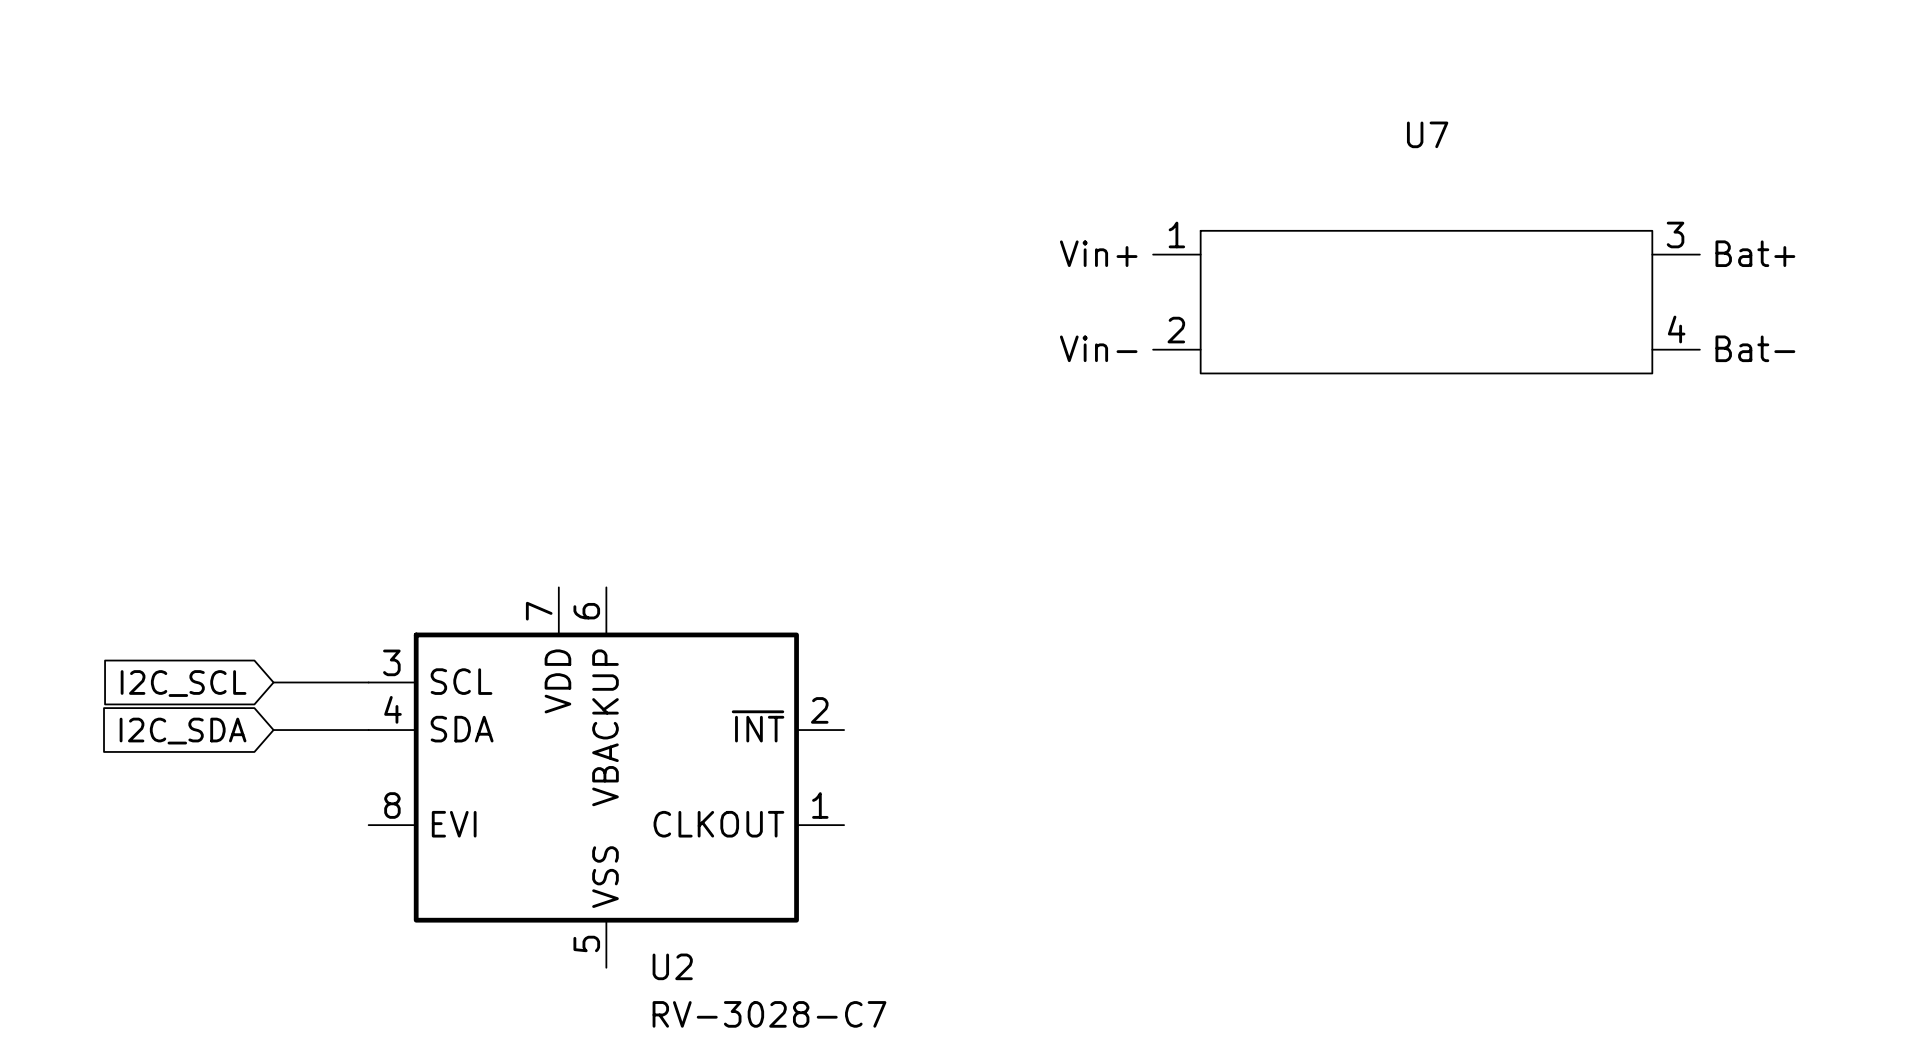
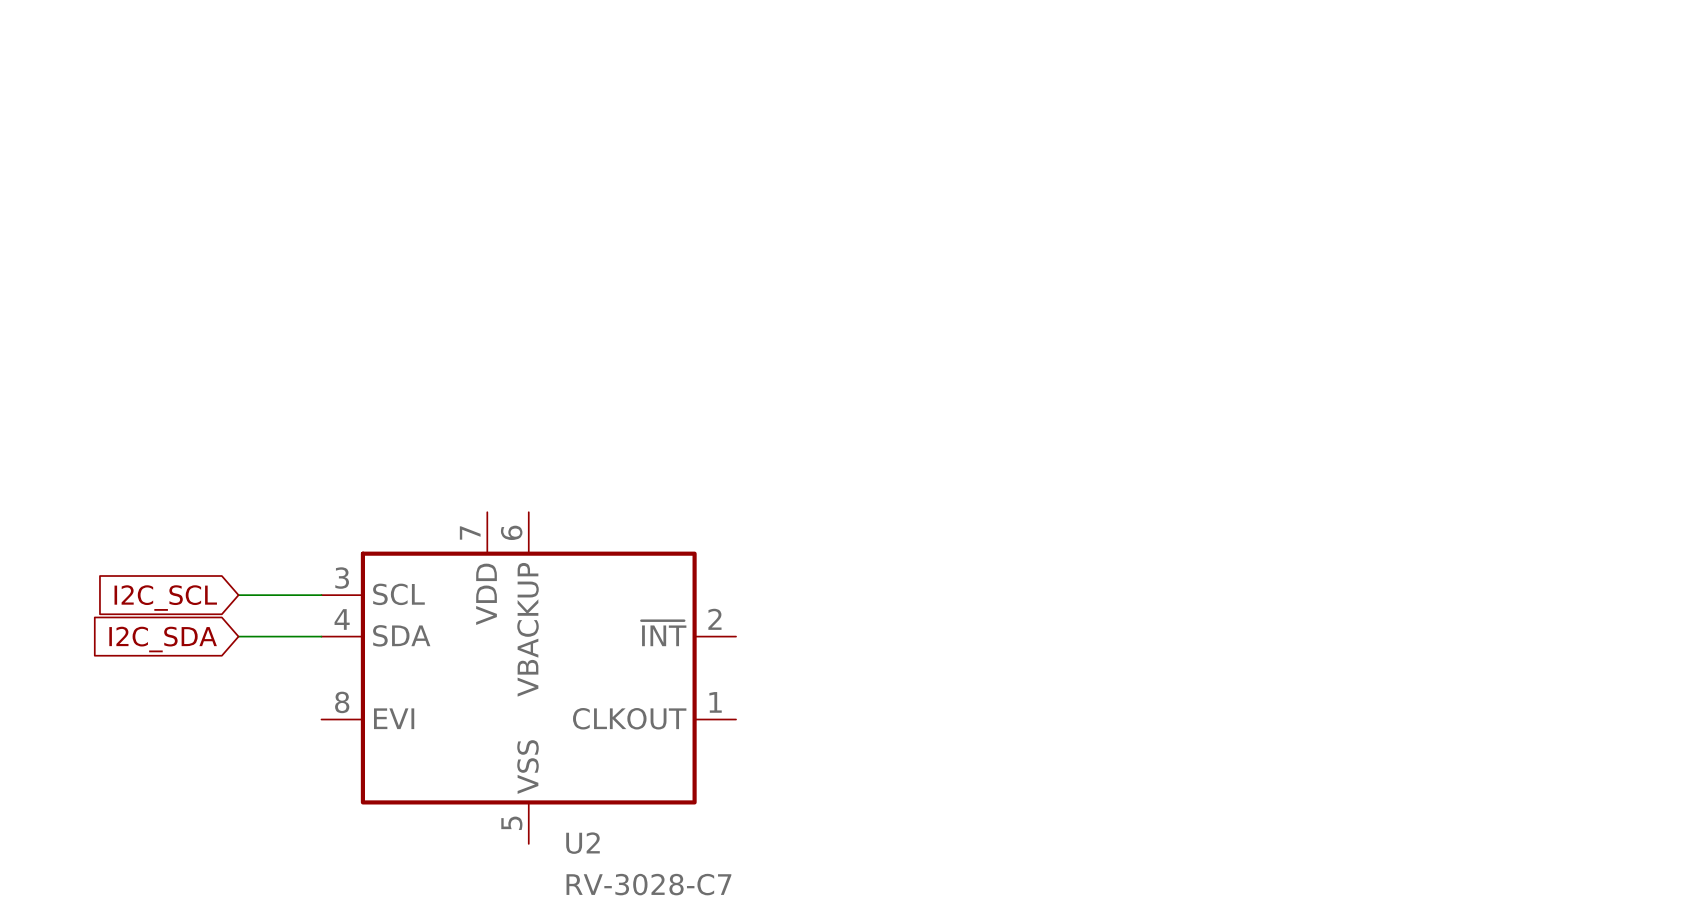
U7: (1426, 302) -> none

